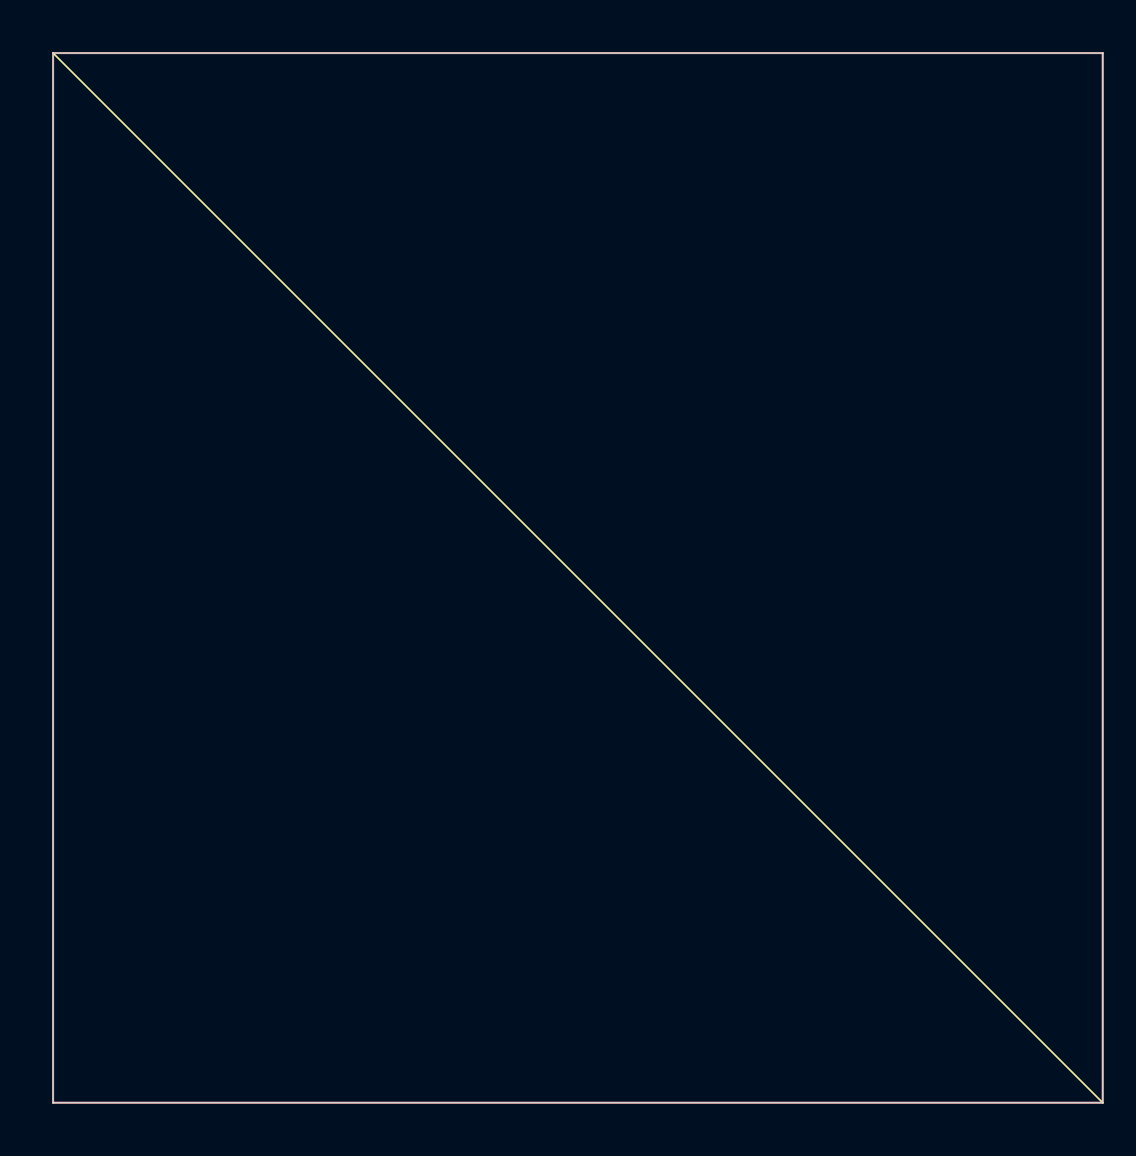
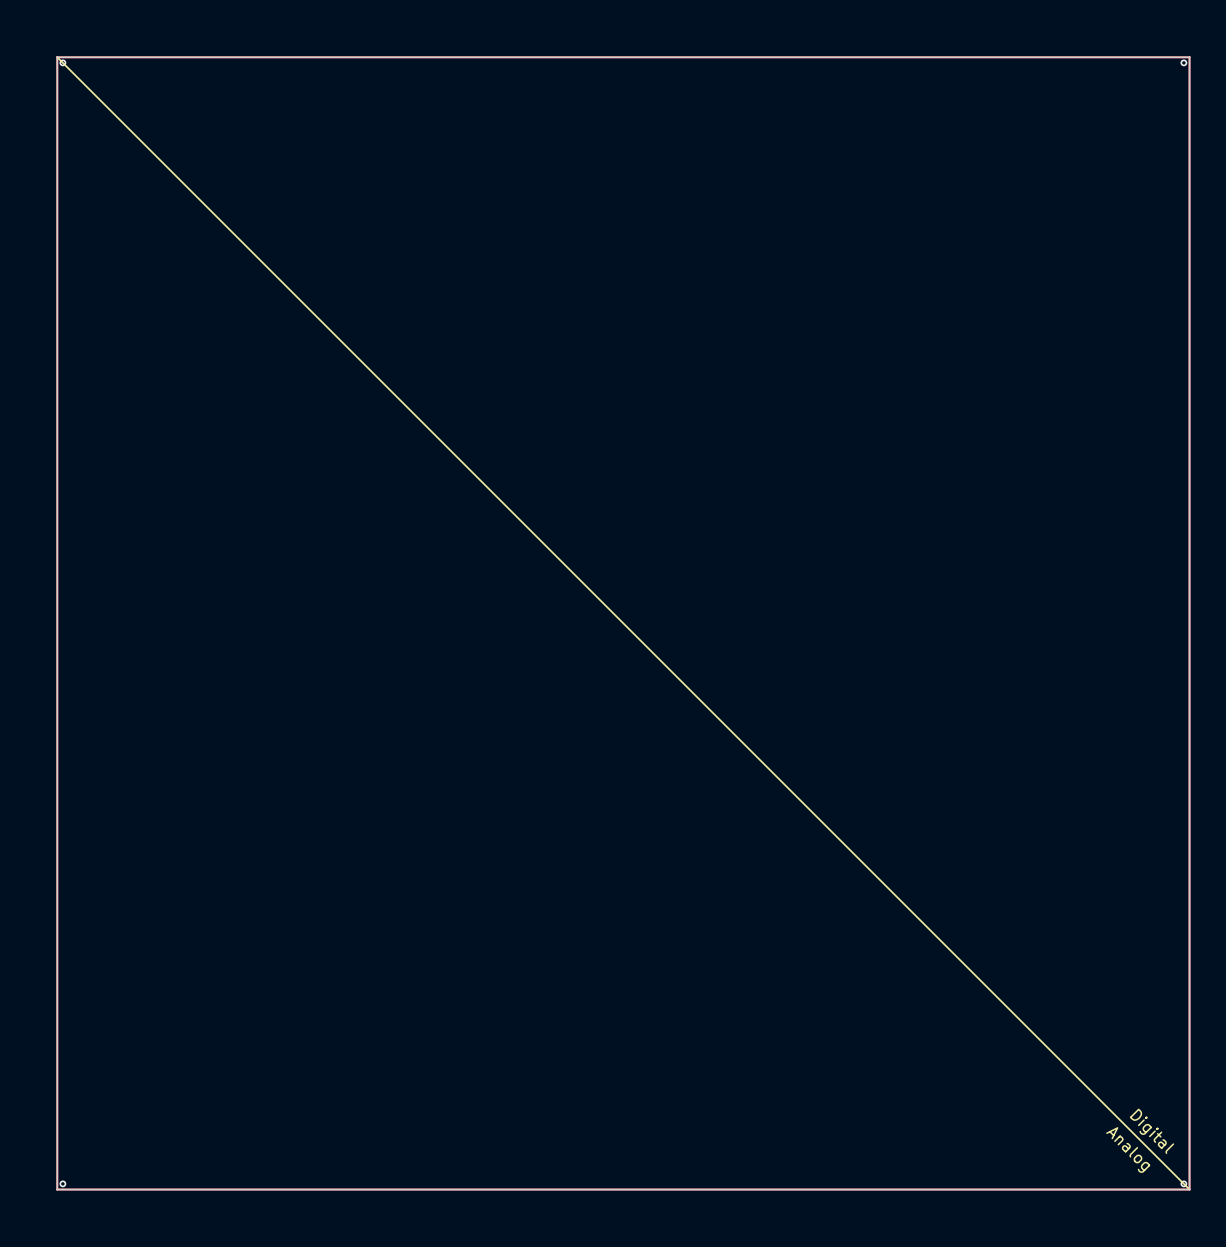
via: none -> (62, 62)
via: none -> (1183, 62)
text: none -> Digital (1152, 1131)
text: none -> Analog (1128, 1150)
via: none -> (62, 1183)
via: none -> (1183, 1183)

